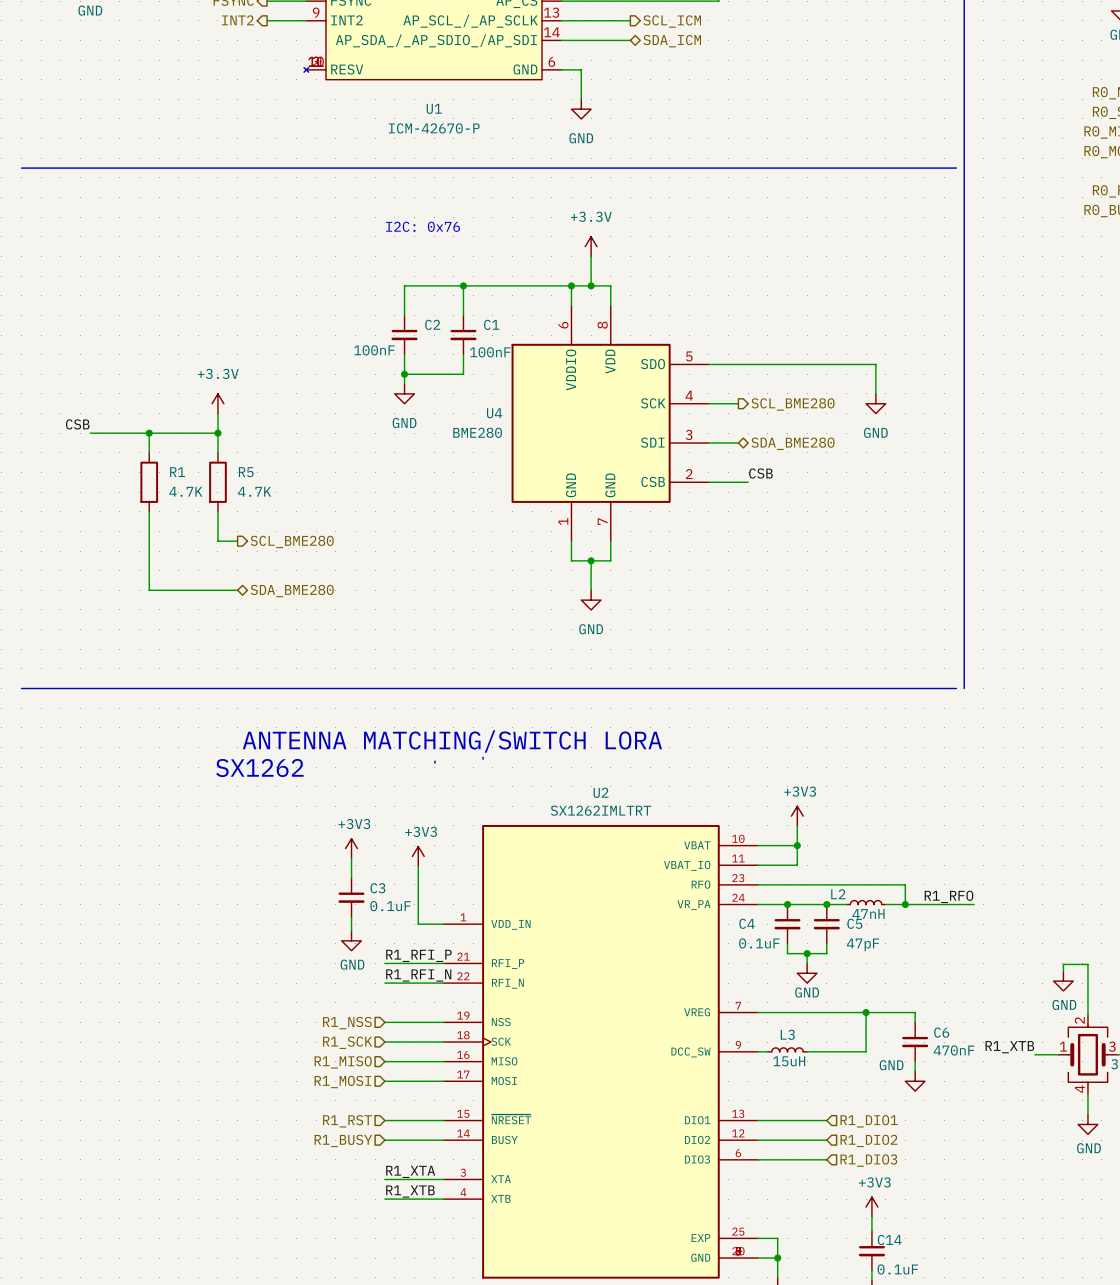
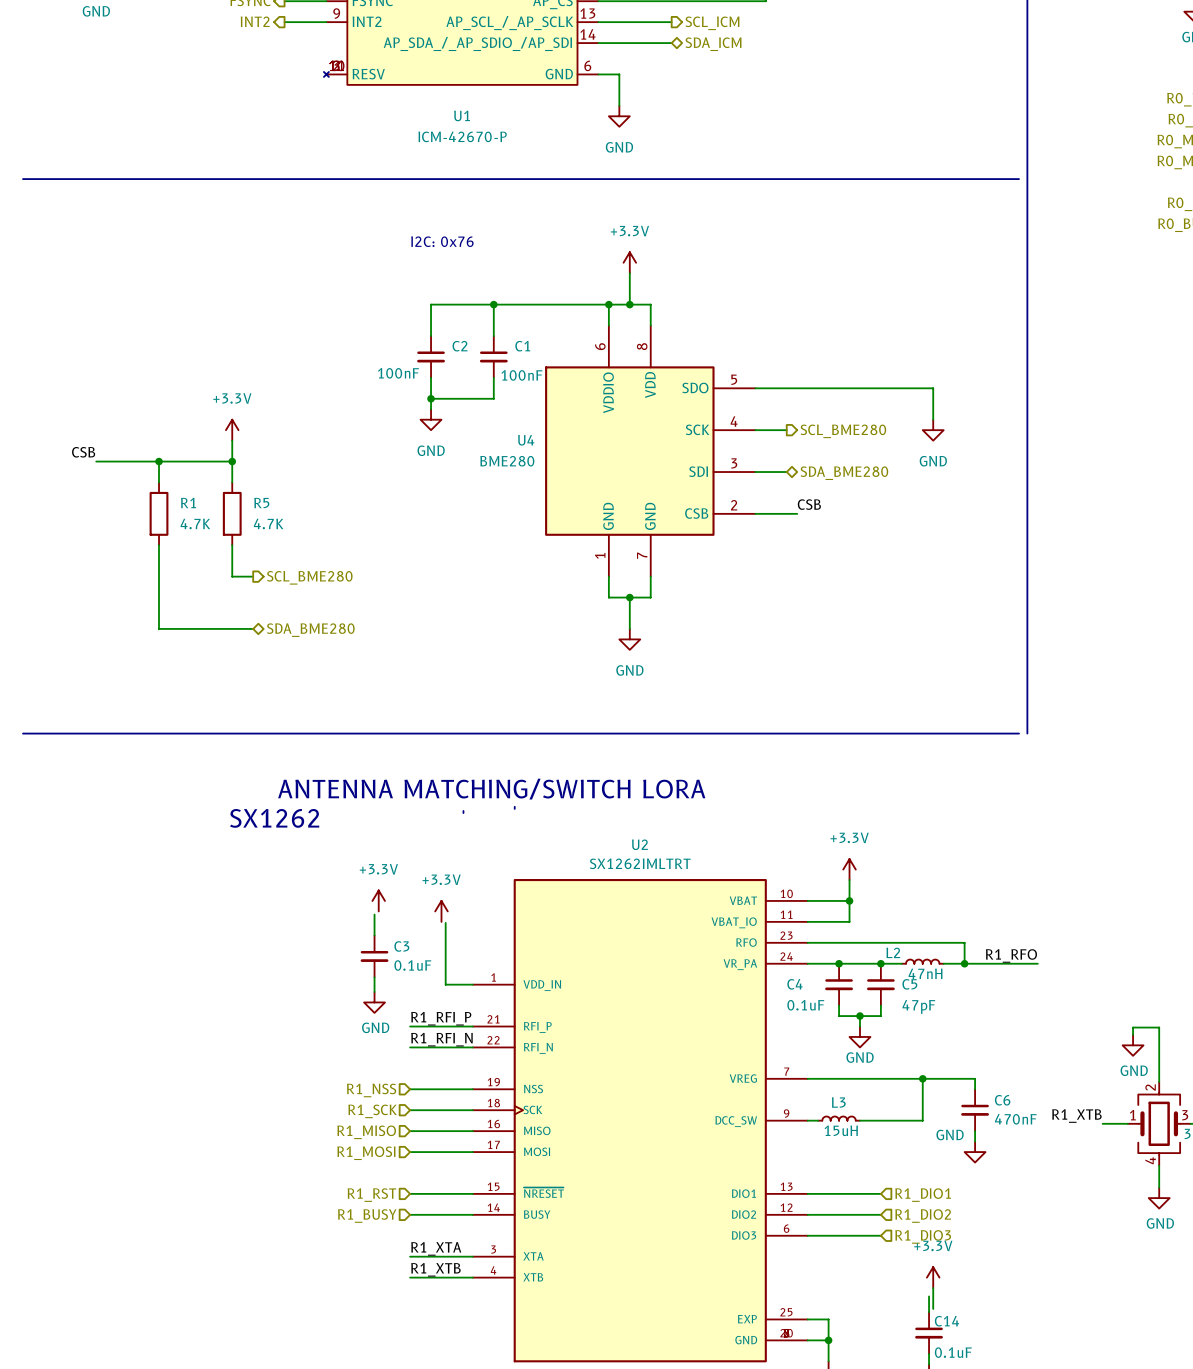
power symbol: +3V3 (797, 816) -> +3.3V (849, 869)
power symbol: +3V3 (351, 848) -> +3.3V (378, 900)
power symbol: +3V3 (418, 856) -> +3.3V (441, 911)
power symbol: none -> +3.3V (933, 1277)
power symbol: +3V3 (871, 1206) -> none
wire: none -> (933, 1288) (933, 1308)

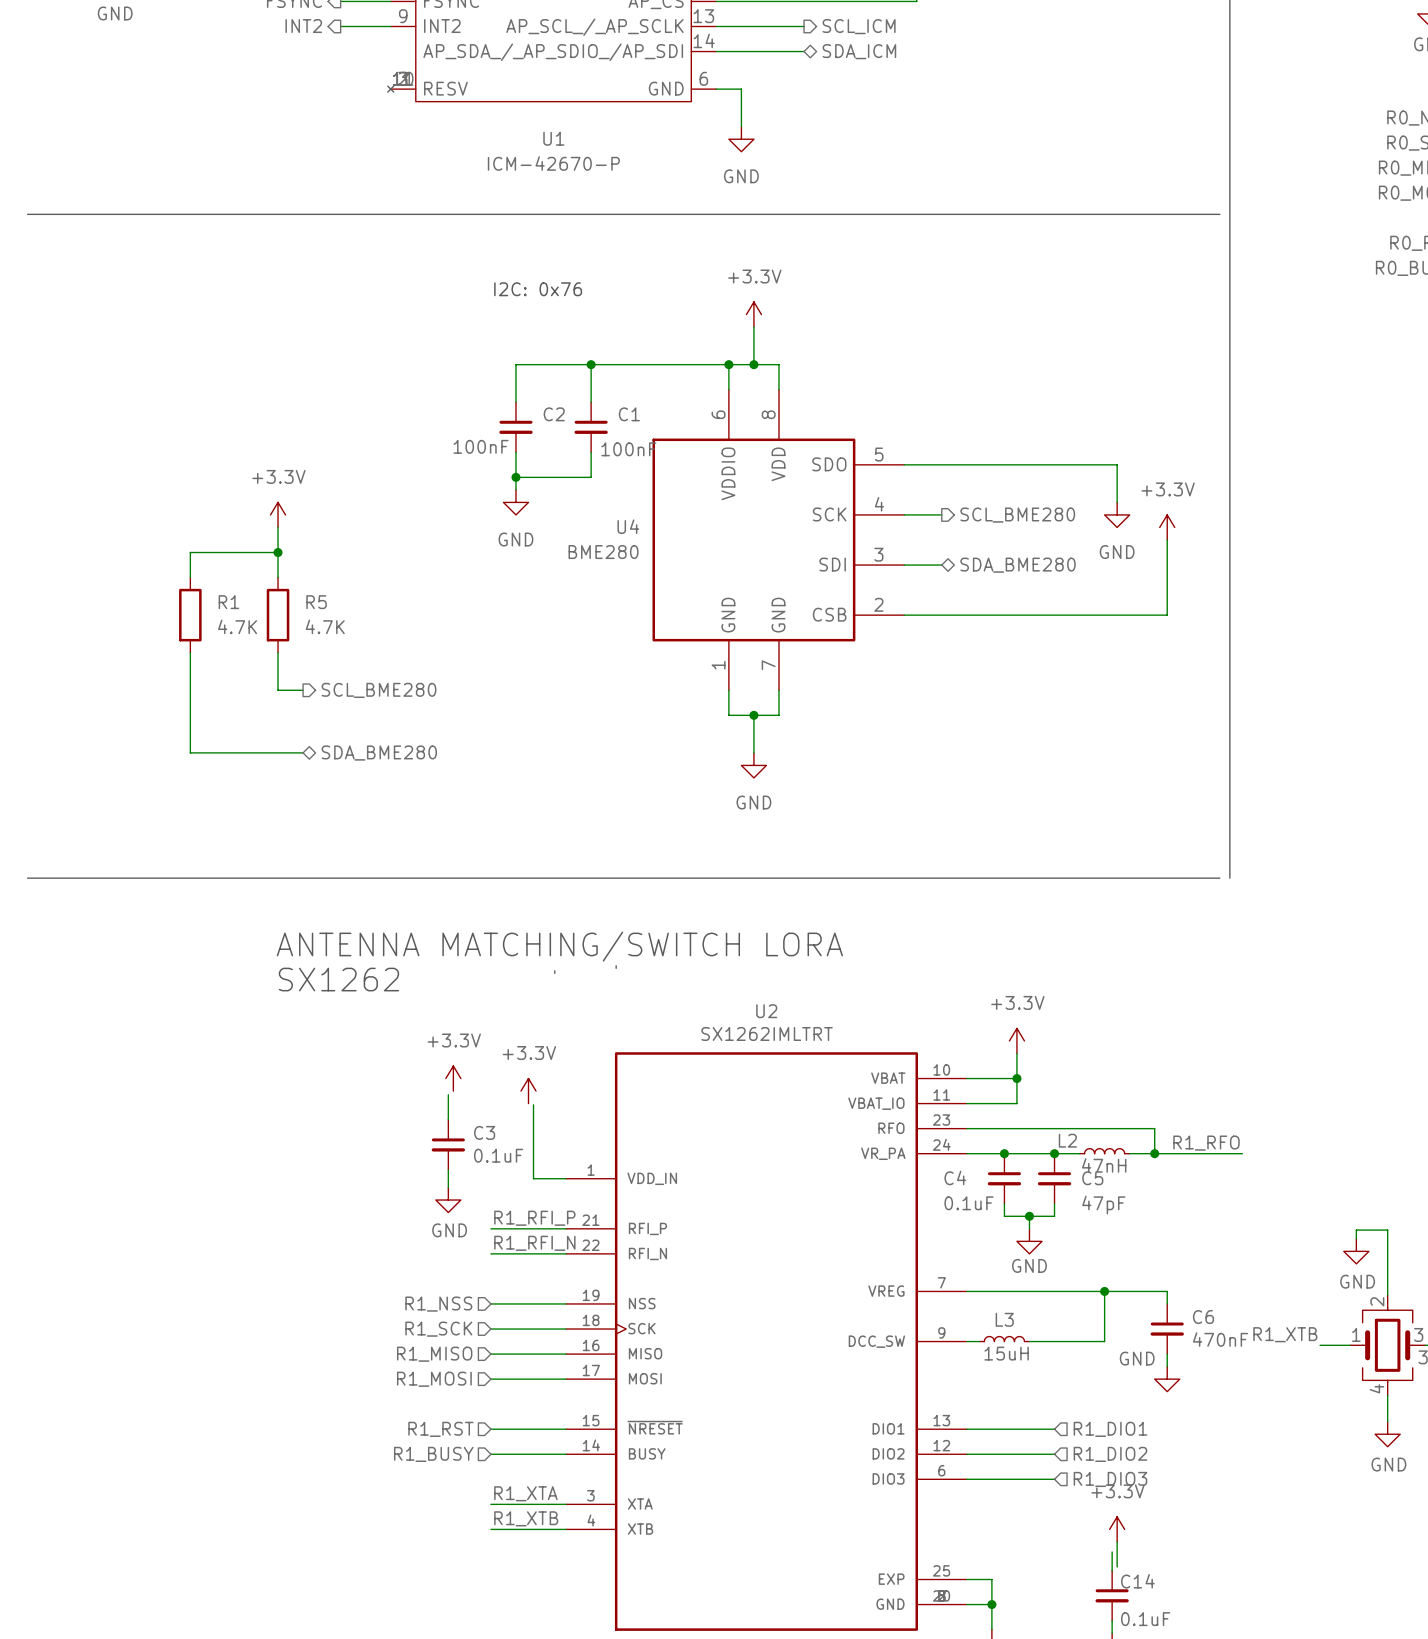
power symbol: none -> +3.3V (1167, 527)
wire: none -> (1167, 539) (1167, 615) (954, 615)
label: CSB (83, 452) -> none
wire: (96, 461) (159, 461) -> none
junction: (159, 461) -> none
label: CSB (809, 504) -> none

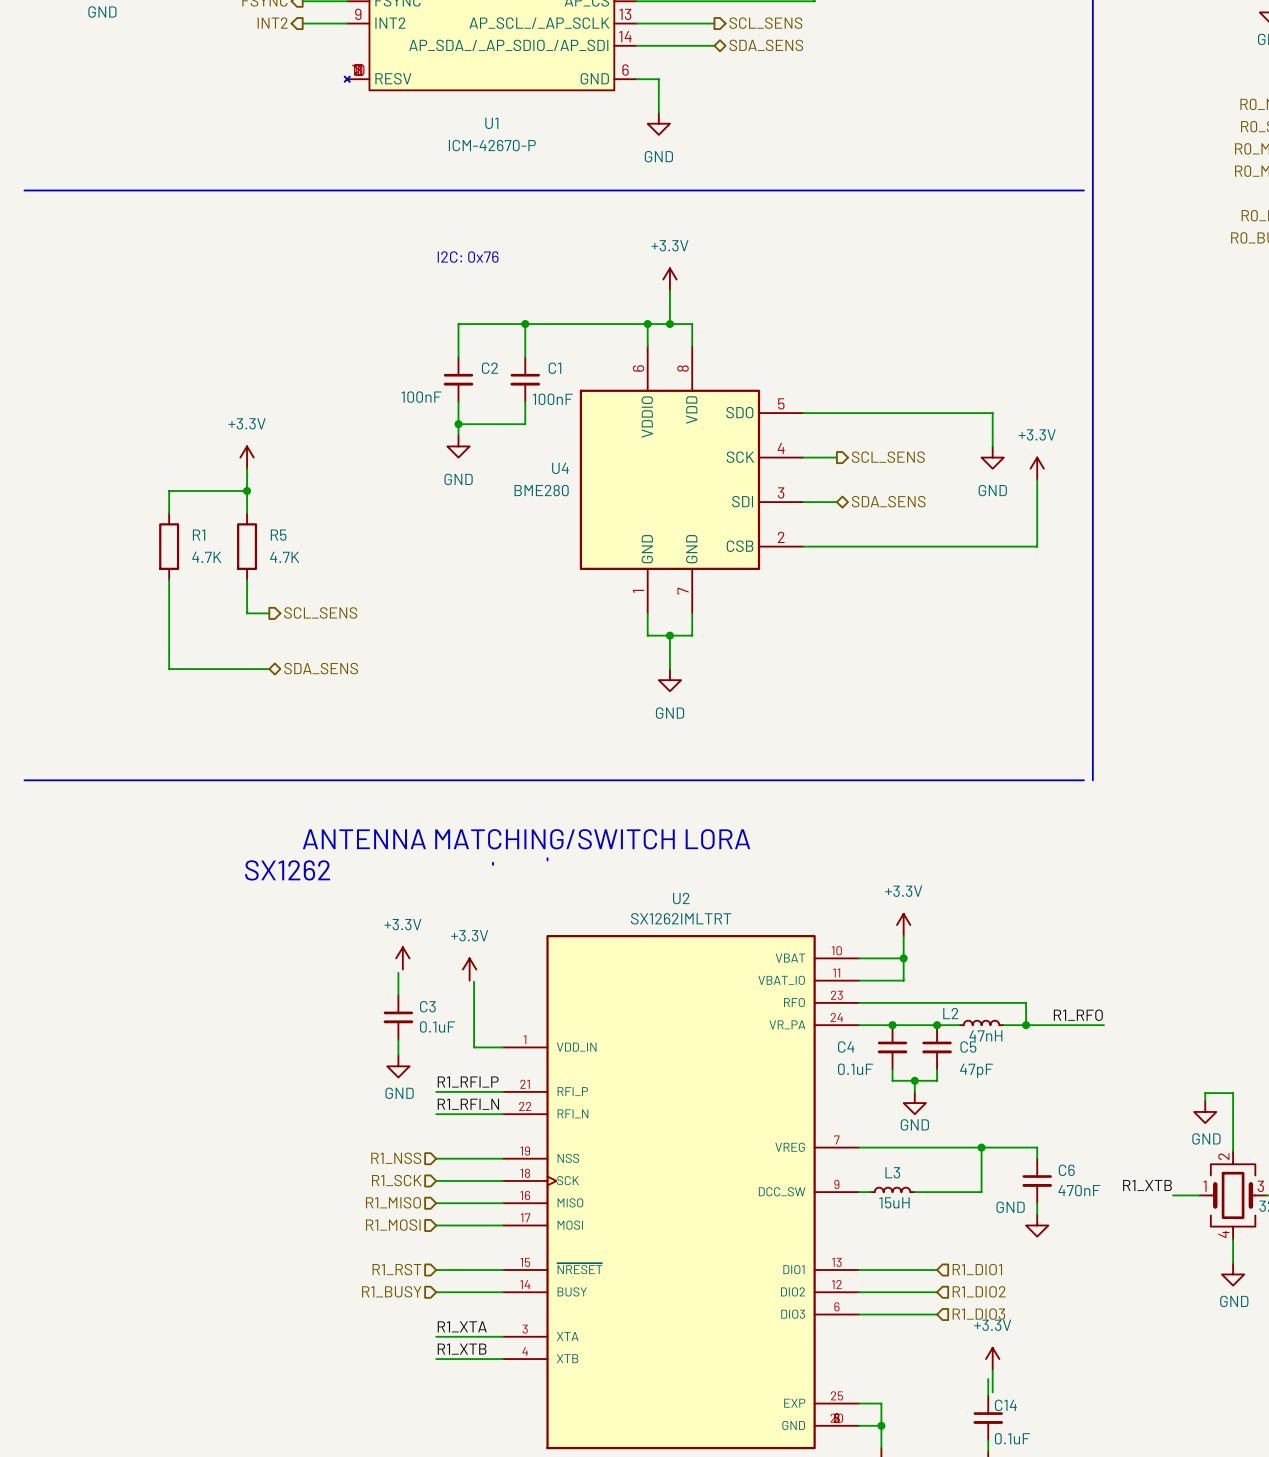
hierarchical label: SCL_ICM (859, 26) -> SCL_SENS (765, 23)
hierarchical label: SDA_ICM (859, 51) -> SDA_SENS (766, 45)
hierarchical label: SCL_BME280 (1017, 515) -> SCL_SENS (888, 457)
hierarchical label: SDA_BME280 (1018, 565) -> SDA_SENS (888, 501)
hierarchical label: SCL_BME280 (379, 690) -> SCL_SENS (320, 612)
hierarchical label: SDA_BME280 (379, 753) -> SDA_SENS (321, 668)

